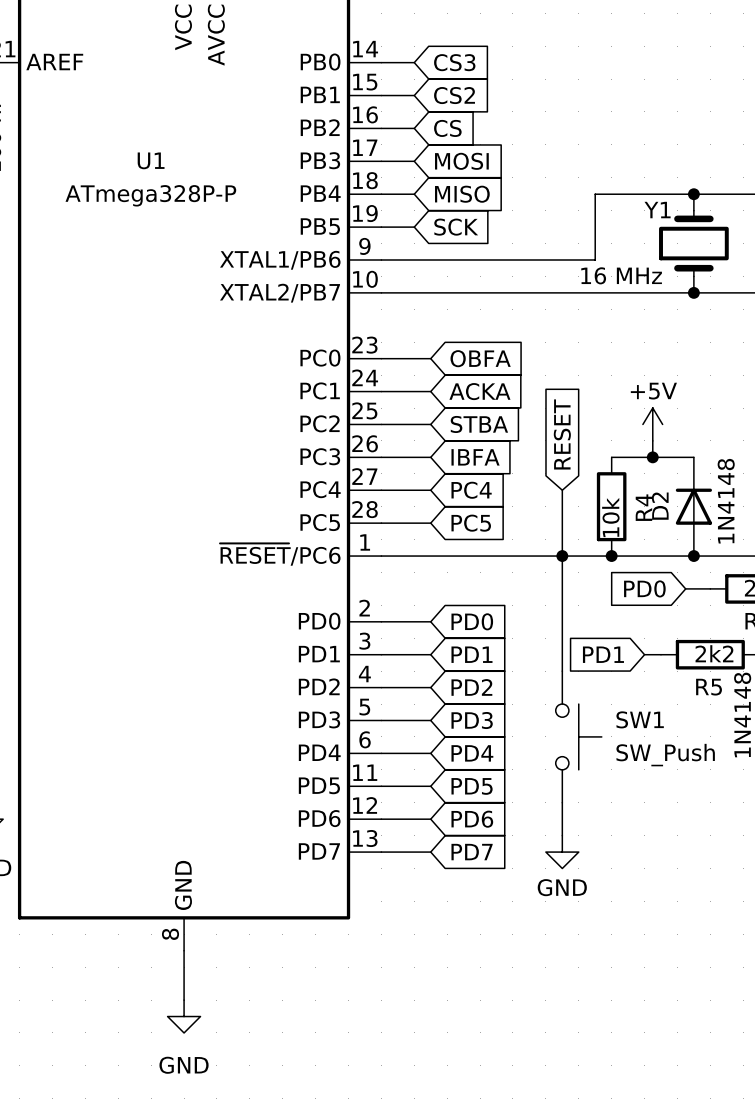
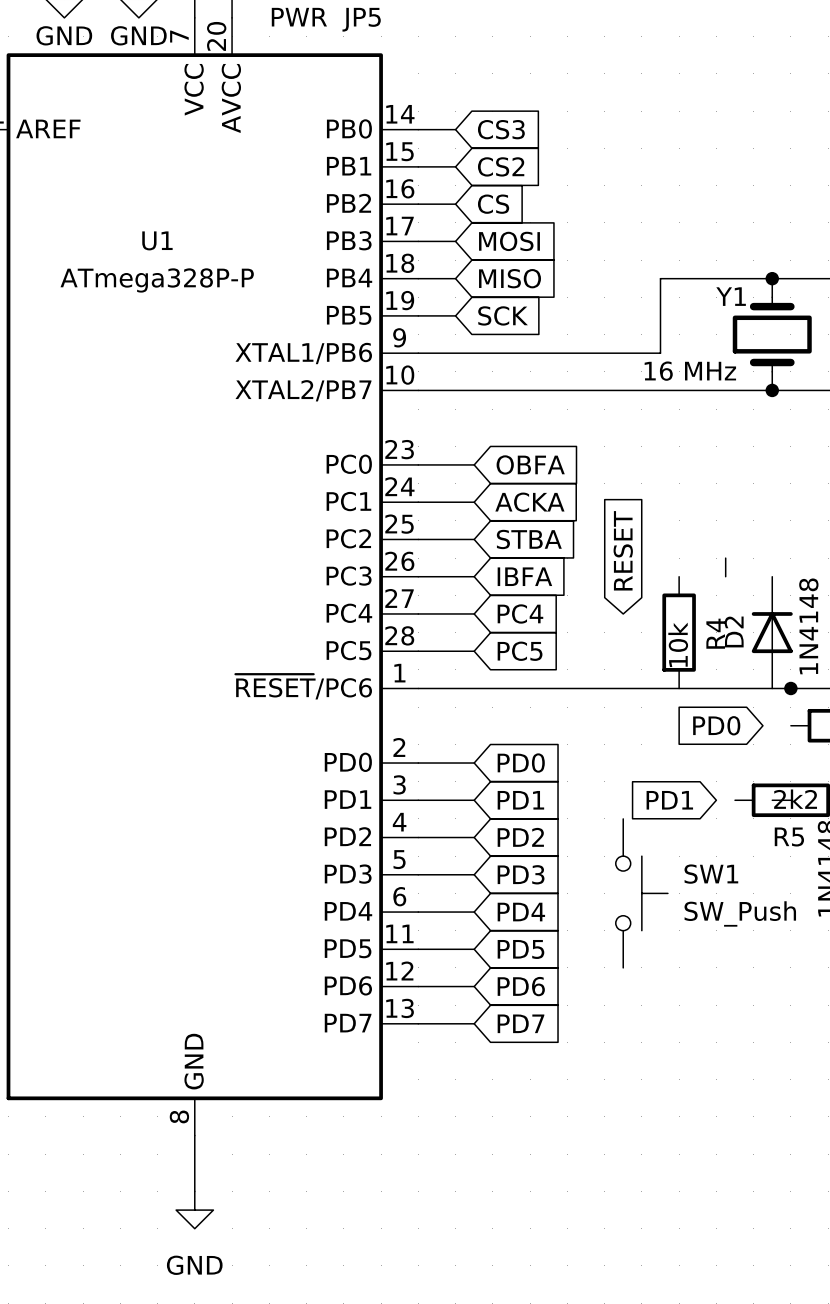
power symbol: +5V (652, 424) -> none
wire: (611, 457) (693, 457) -> none
junction: (652, 457) -> none
wire: (562, 490) (562, 671) -> none
junction: (562, 556) -> none
junction: (611, 556) -> none
junction position: (693, 556) -> (790, 688)
wire: (685, 588) (710, 588) -> none
wire: (644, 654) (661, 654) -> (772, 800) (790, 800)
wire: (562, 802) (562, 835) -> none
power symbol: GND (562, 852) -> none

